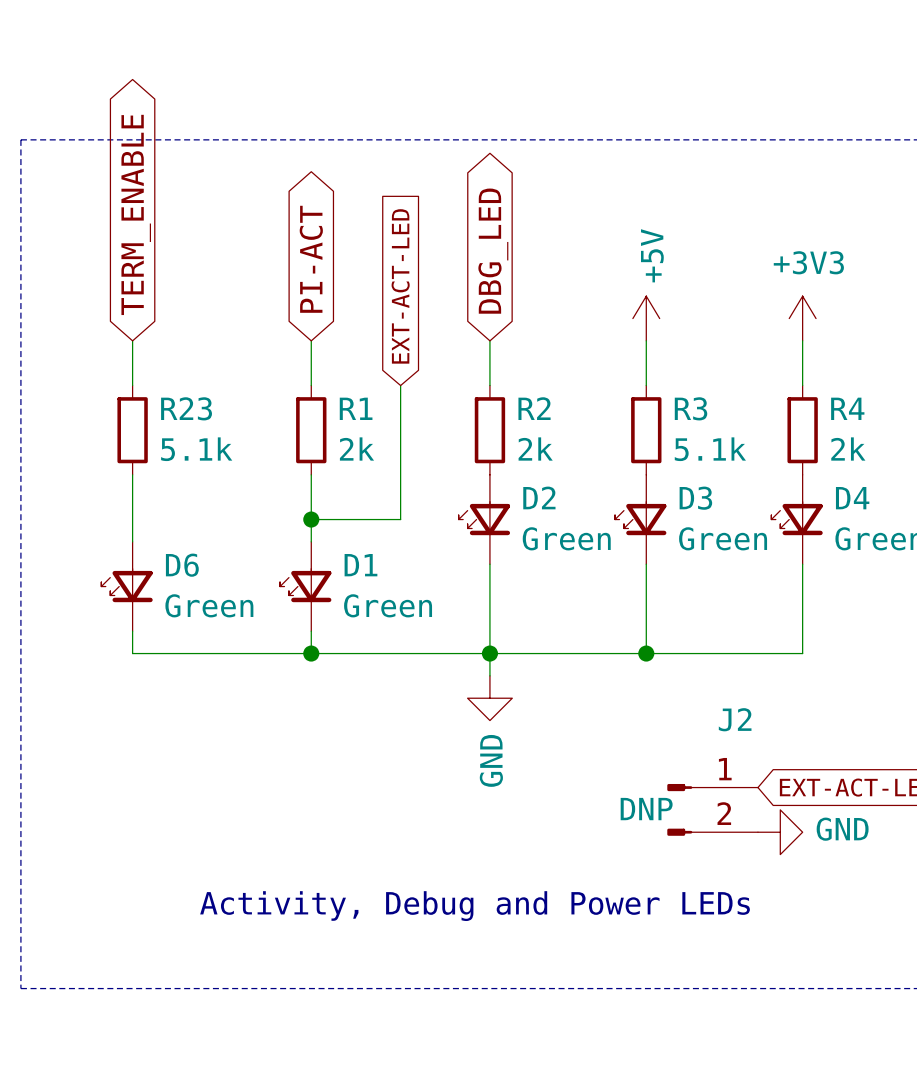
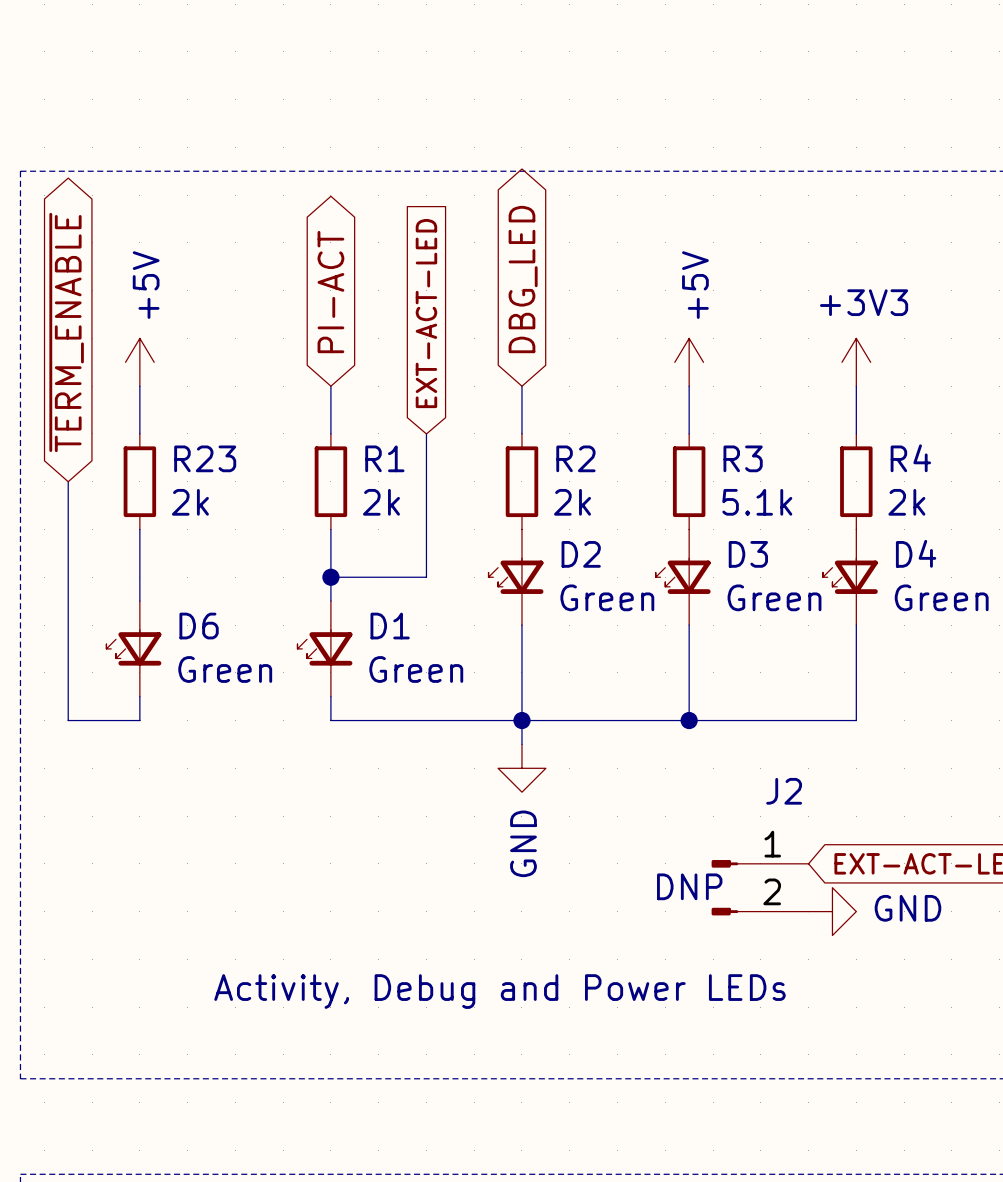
global label: TERM_ENABLE (136, 214) -> none
global label: none -> ~{TERM_ENABLE} (66, 332)
power symbol: none -> +5V (139, 362)
R23 value: 5.1k (196, 449) -> 2k (190, 502)
wire: (132, 653) (311, 653) -> (139, 720) (68, 720) (68, 481)
junction: (311, 653) -> none

